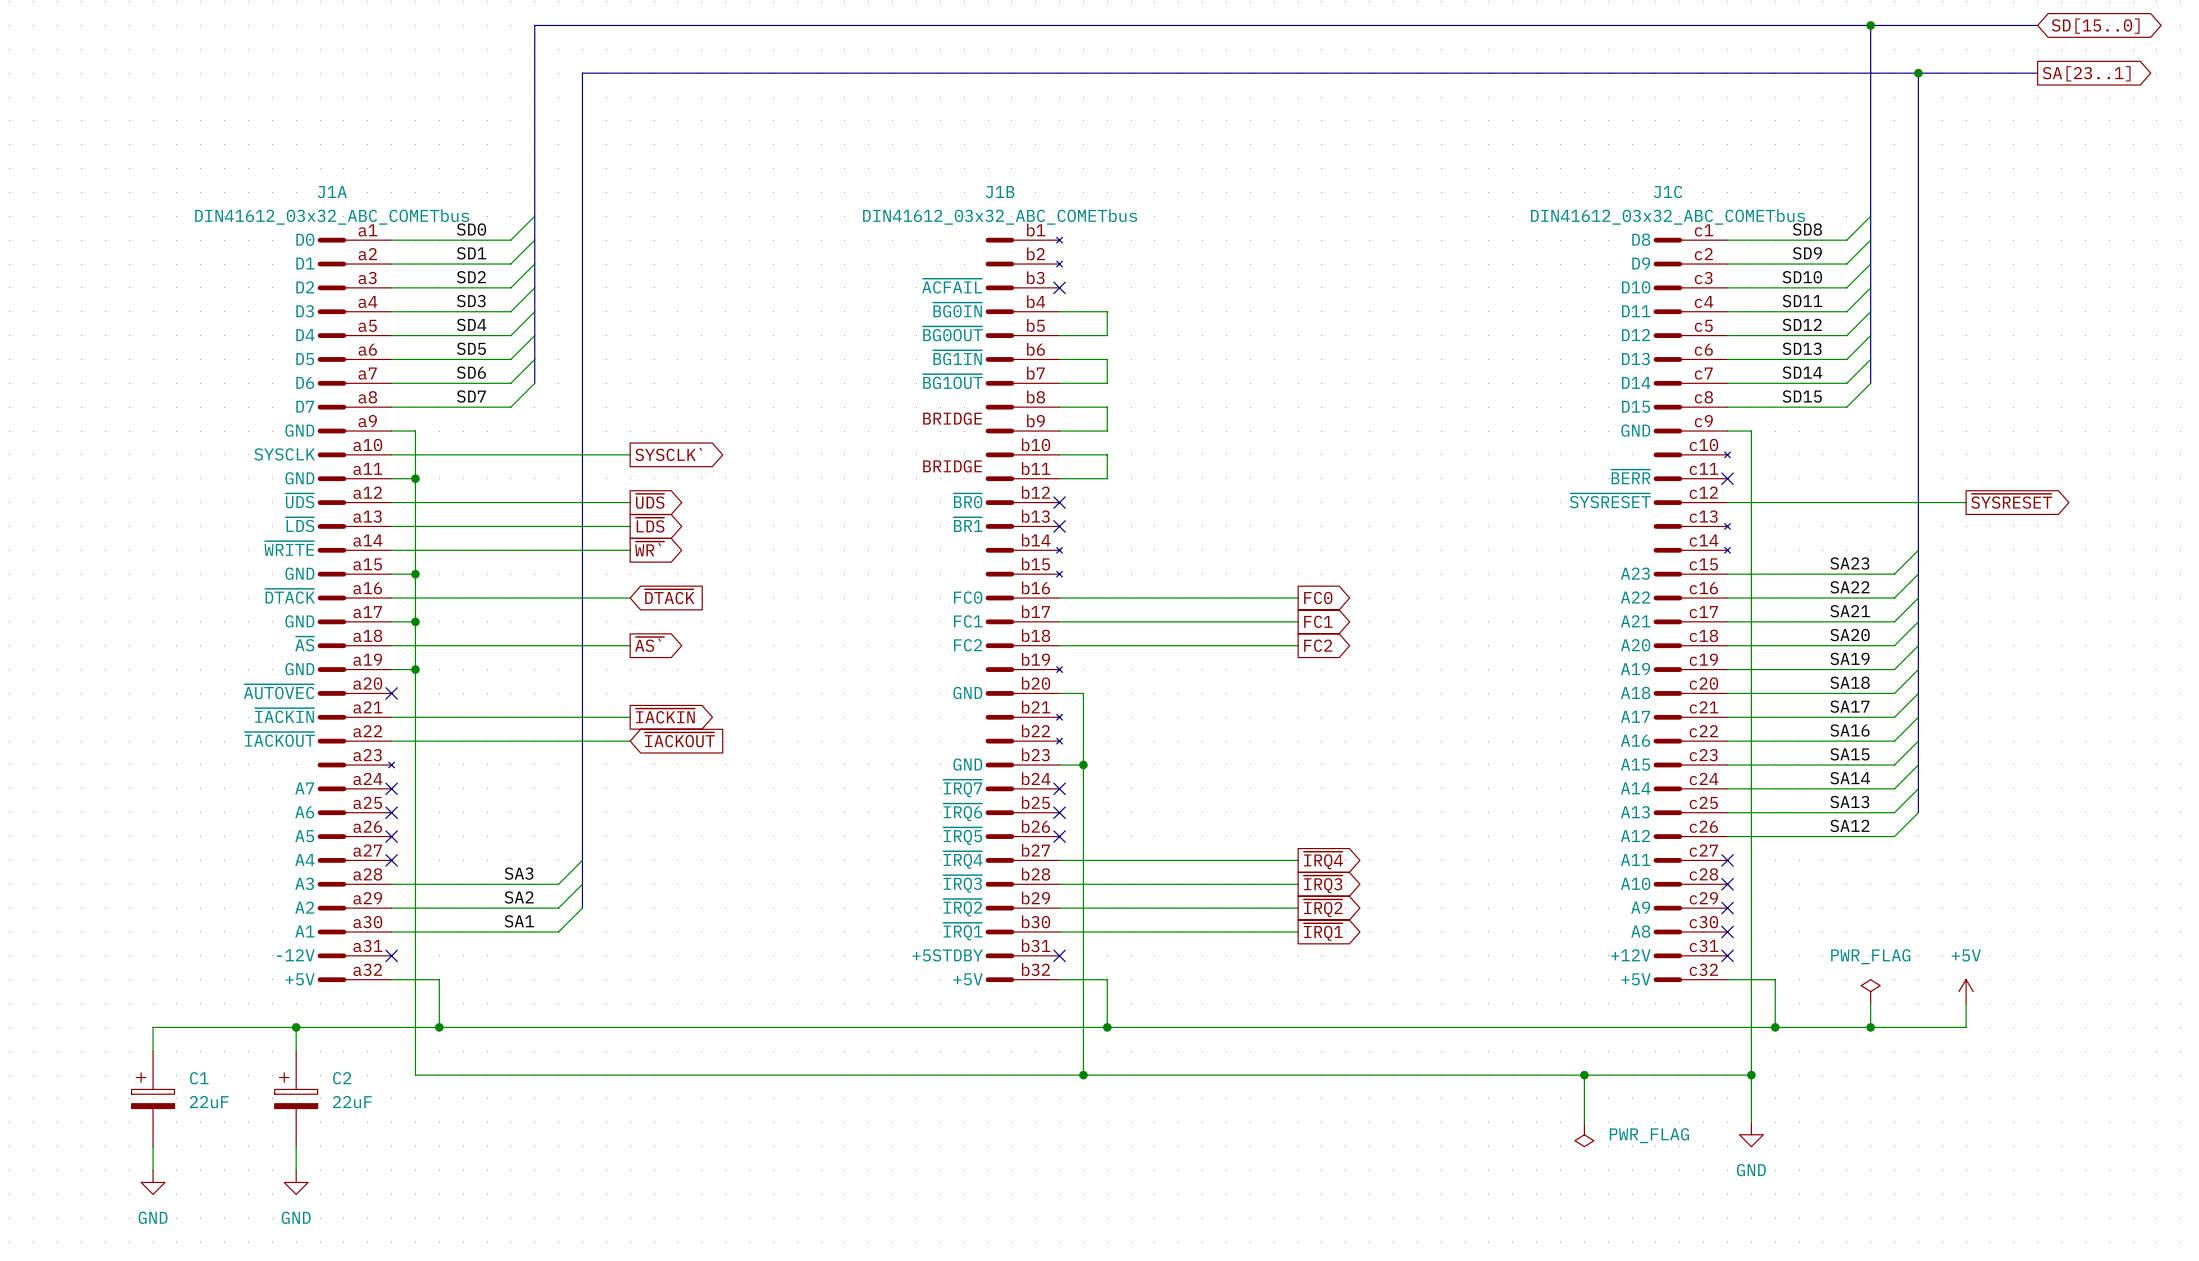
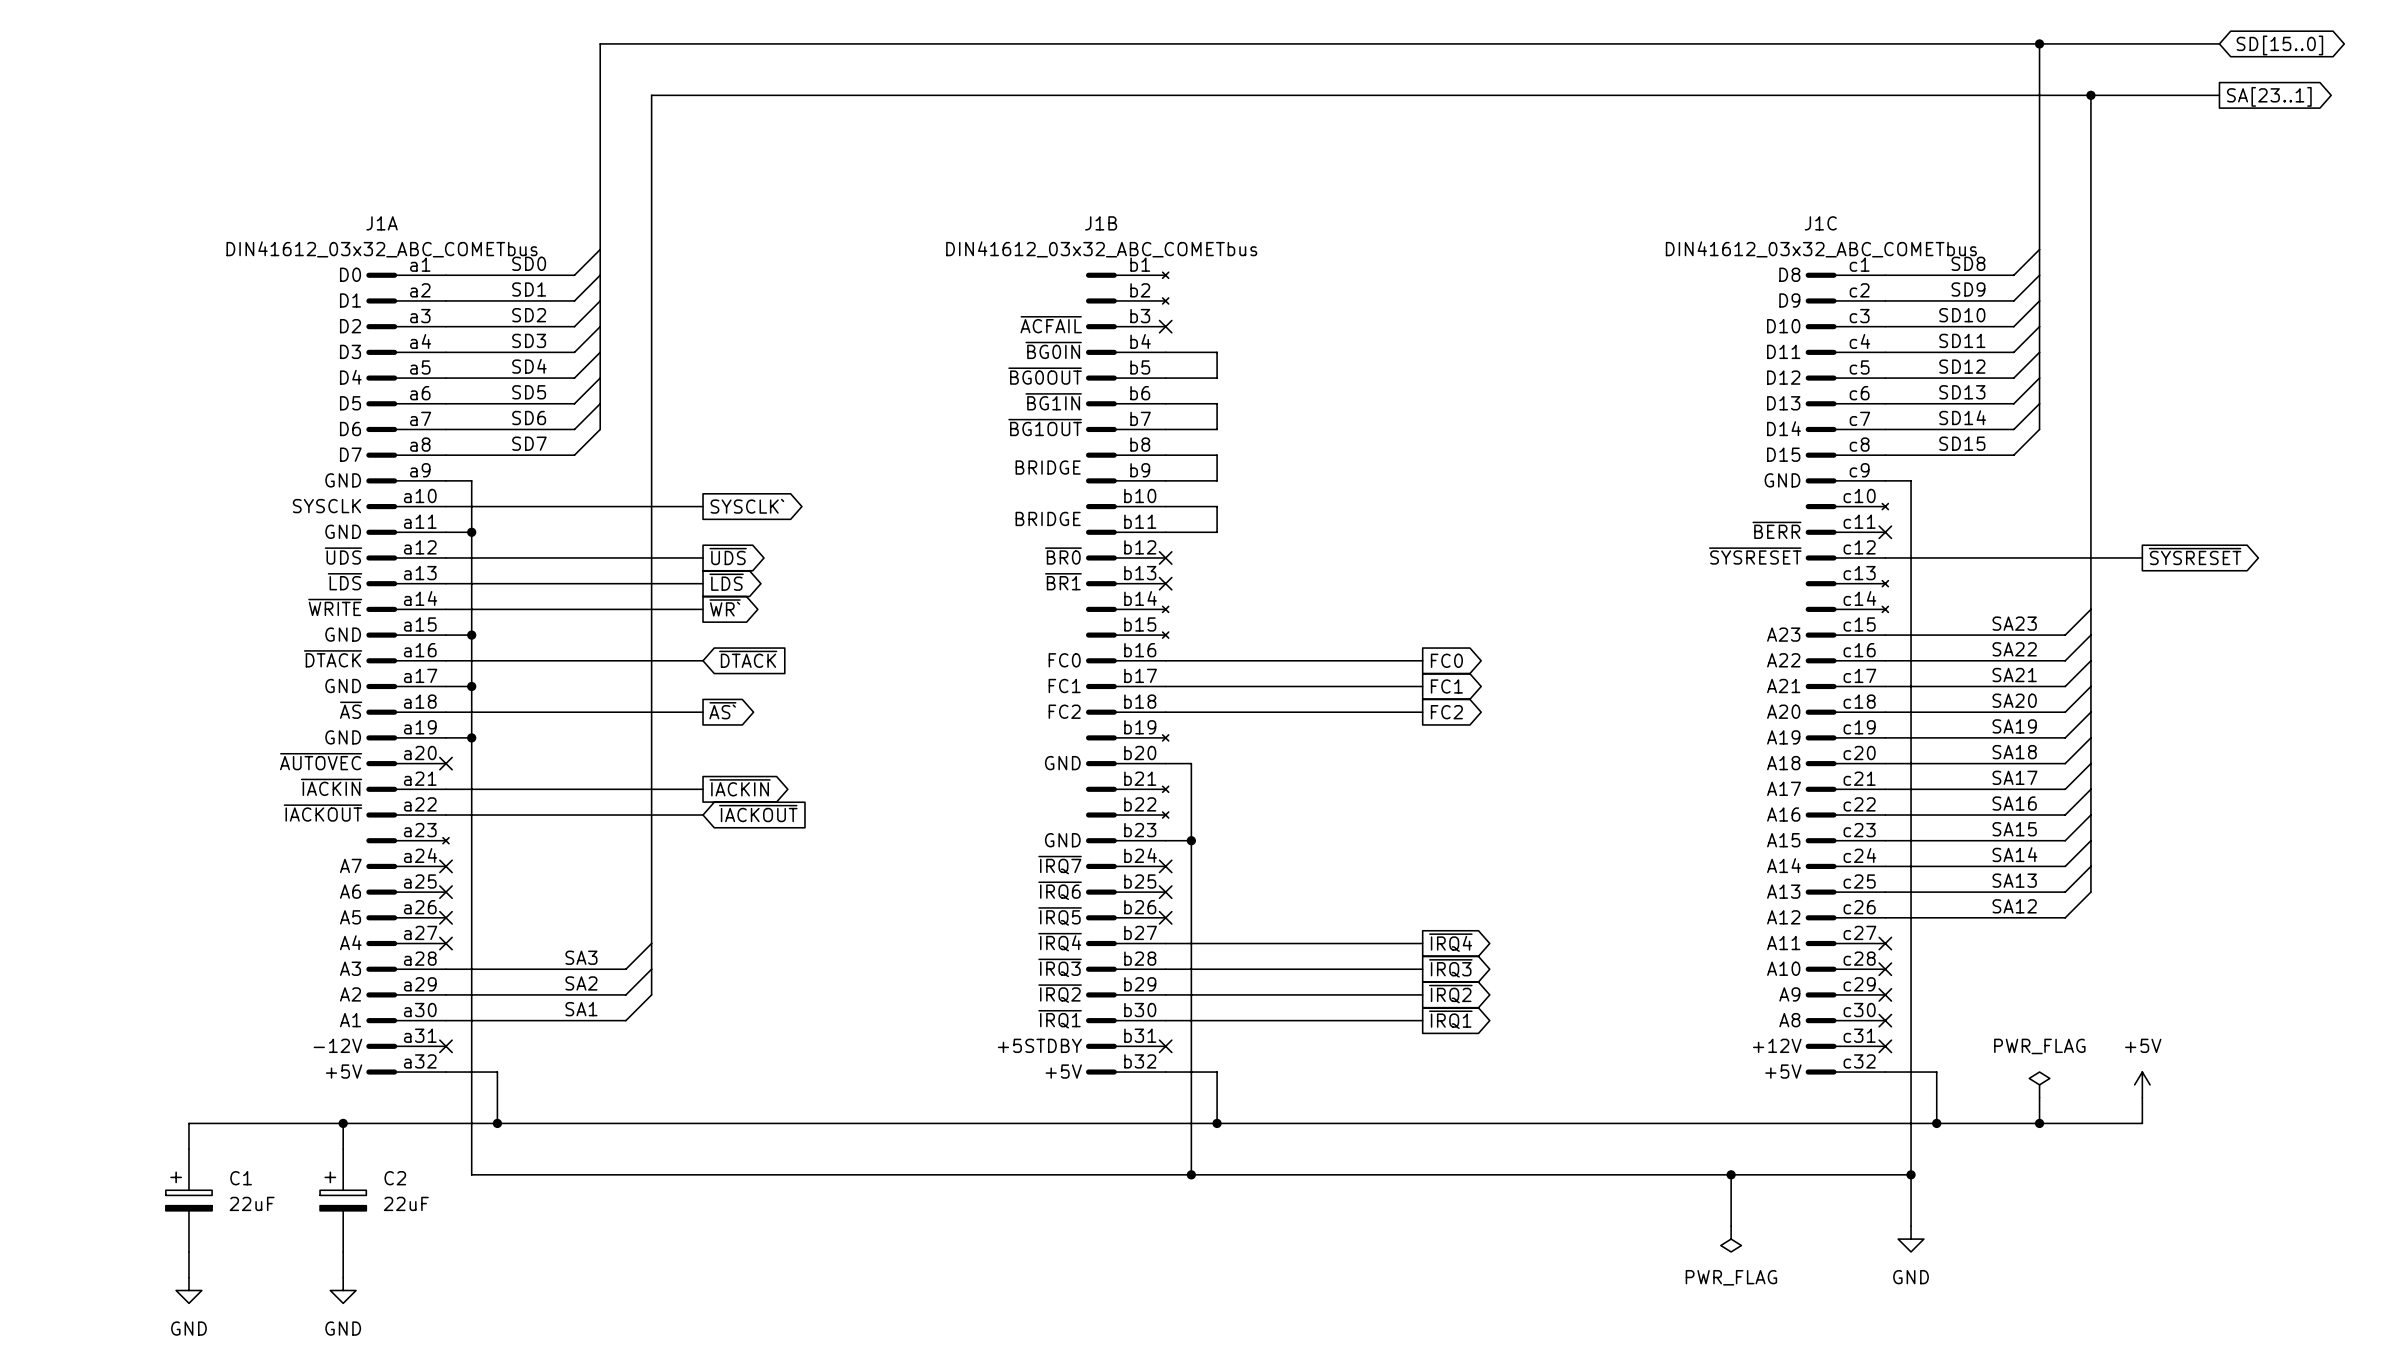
power symbol text position: PWR_FLAG (1649, 1135) -> PWR_FLAG (1731, 1277)

